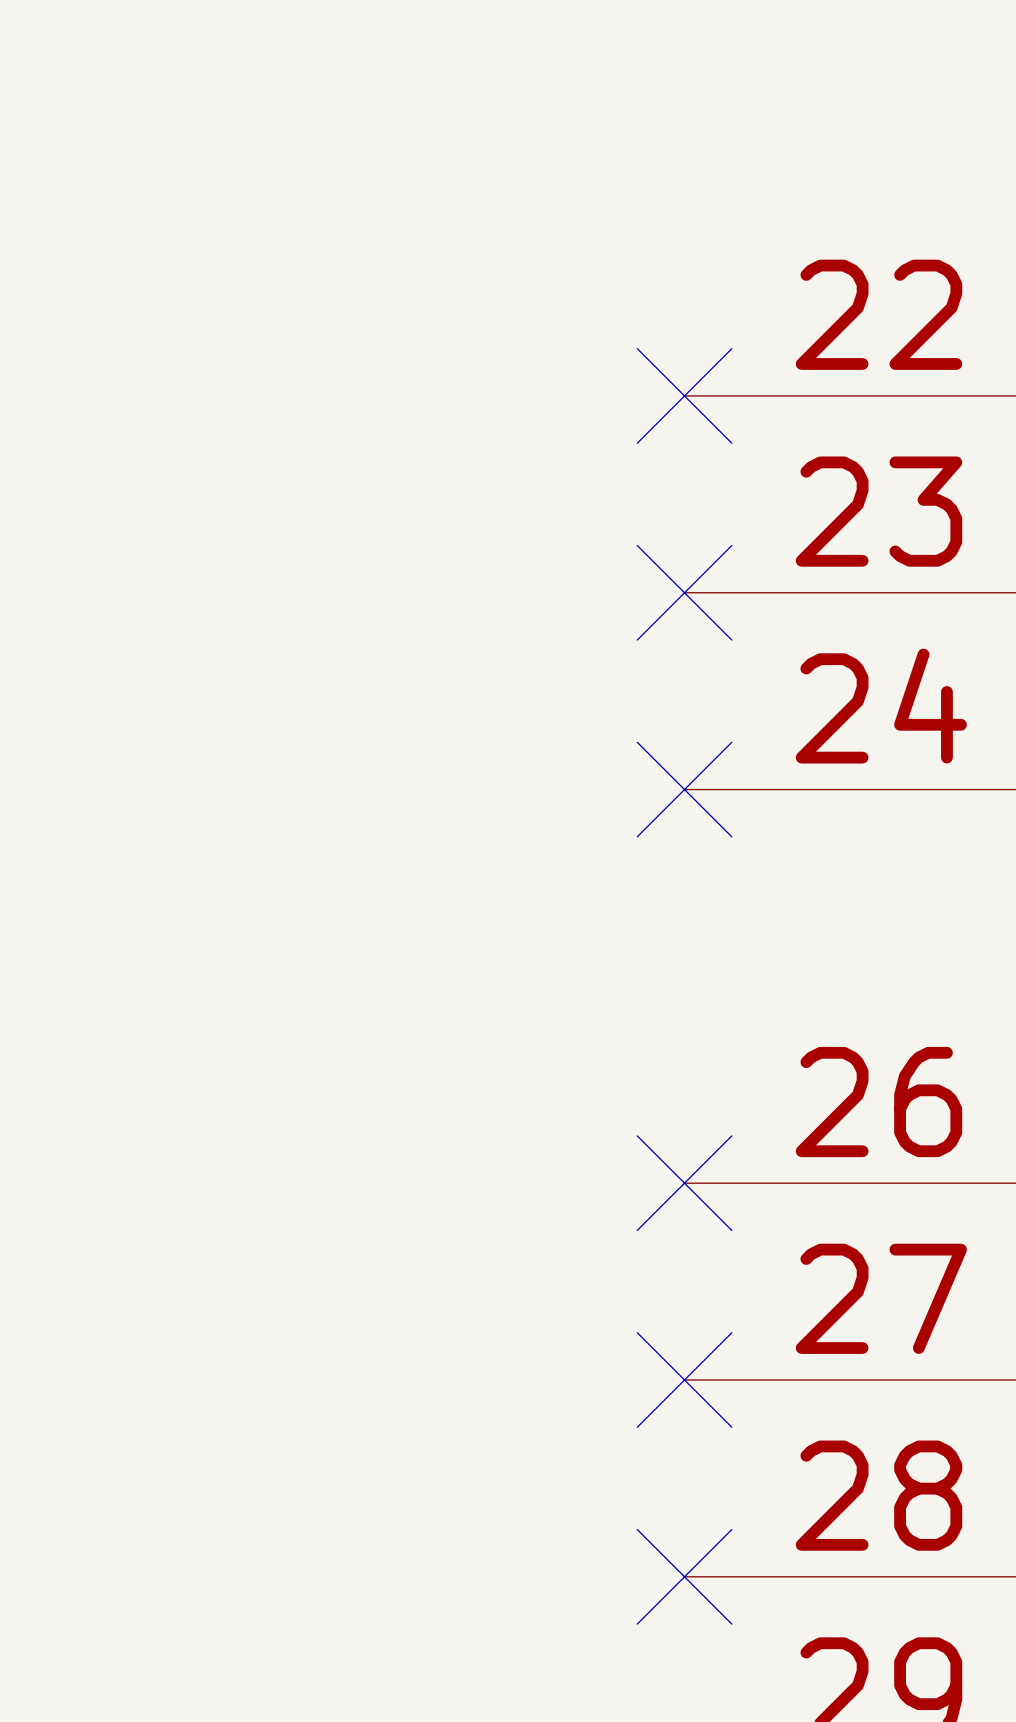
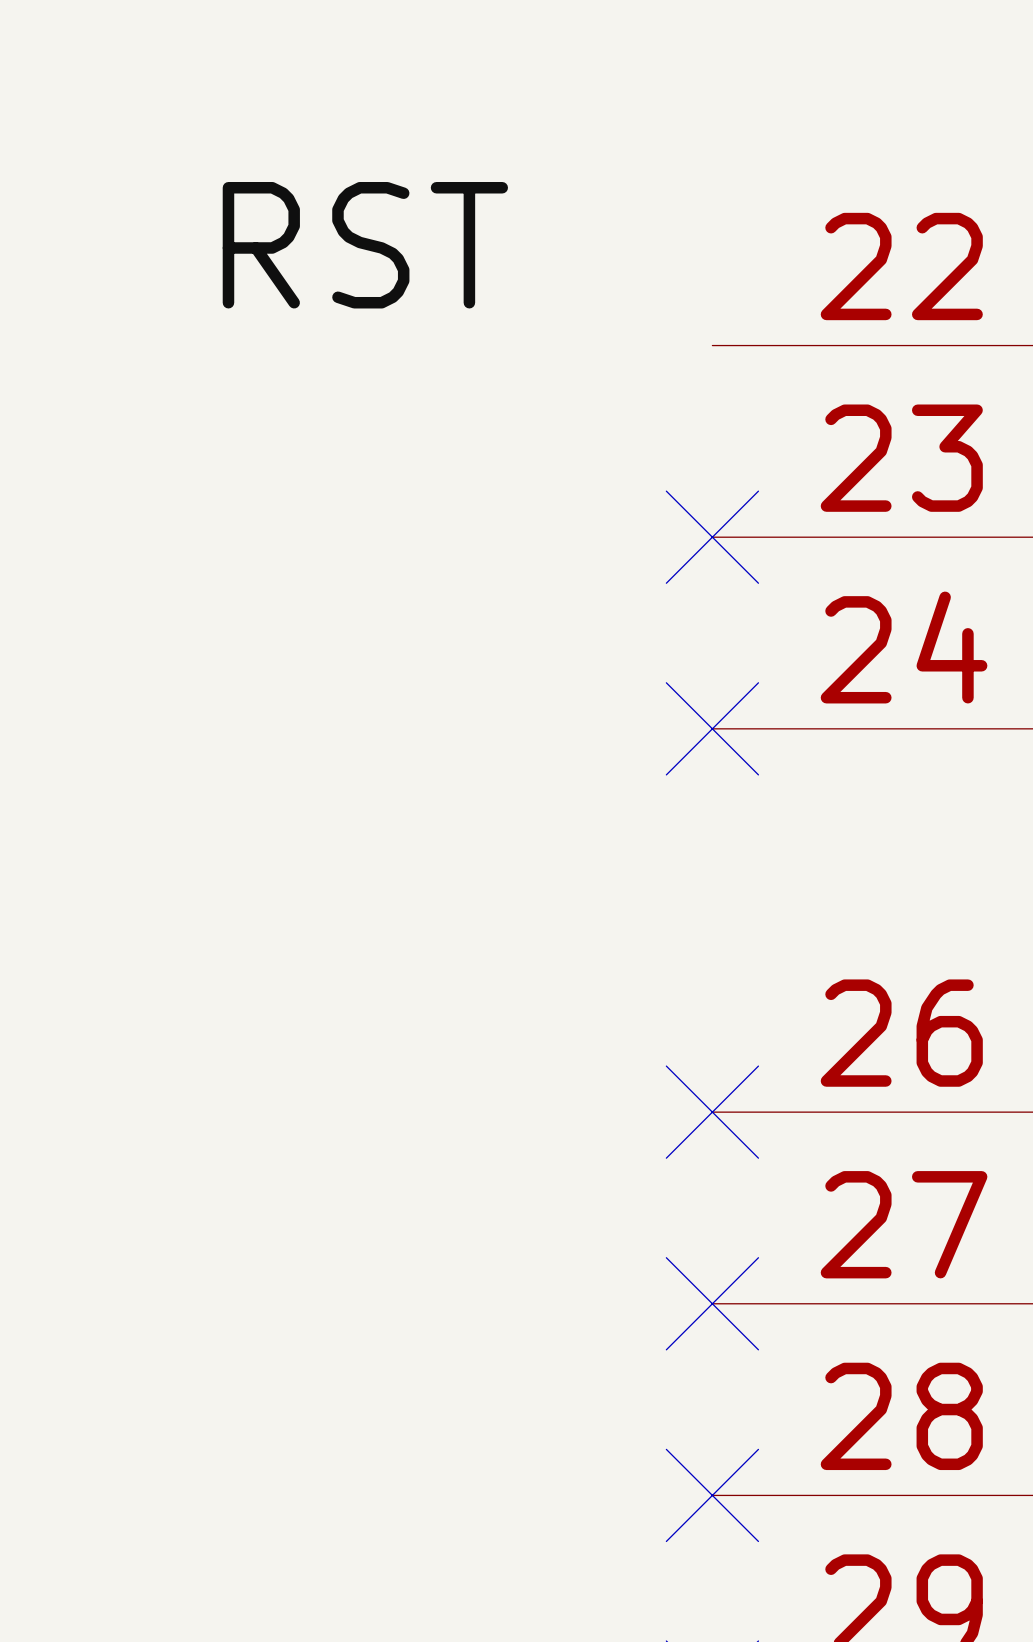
label: none -> RST (365, 245)
no-connect mark: (684, 395) -> none

